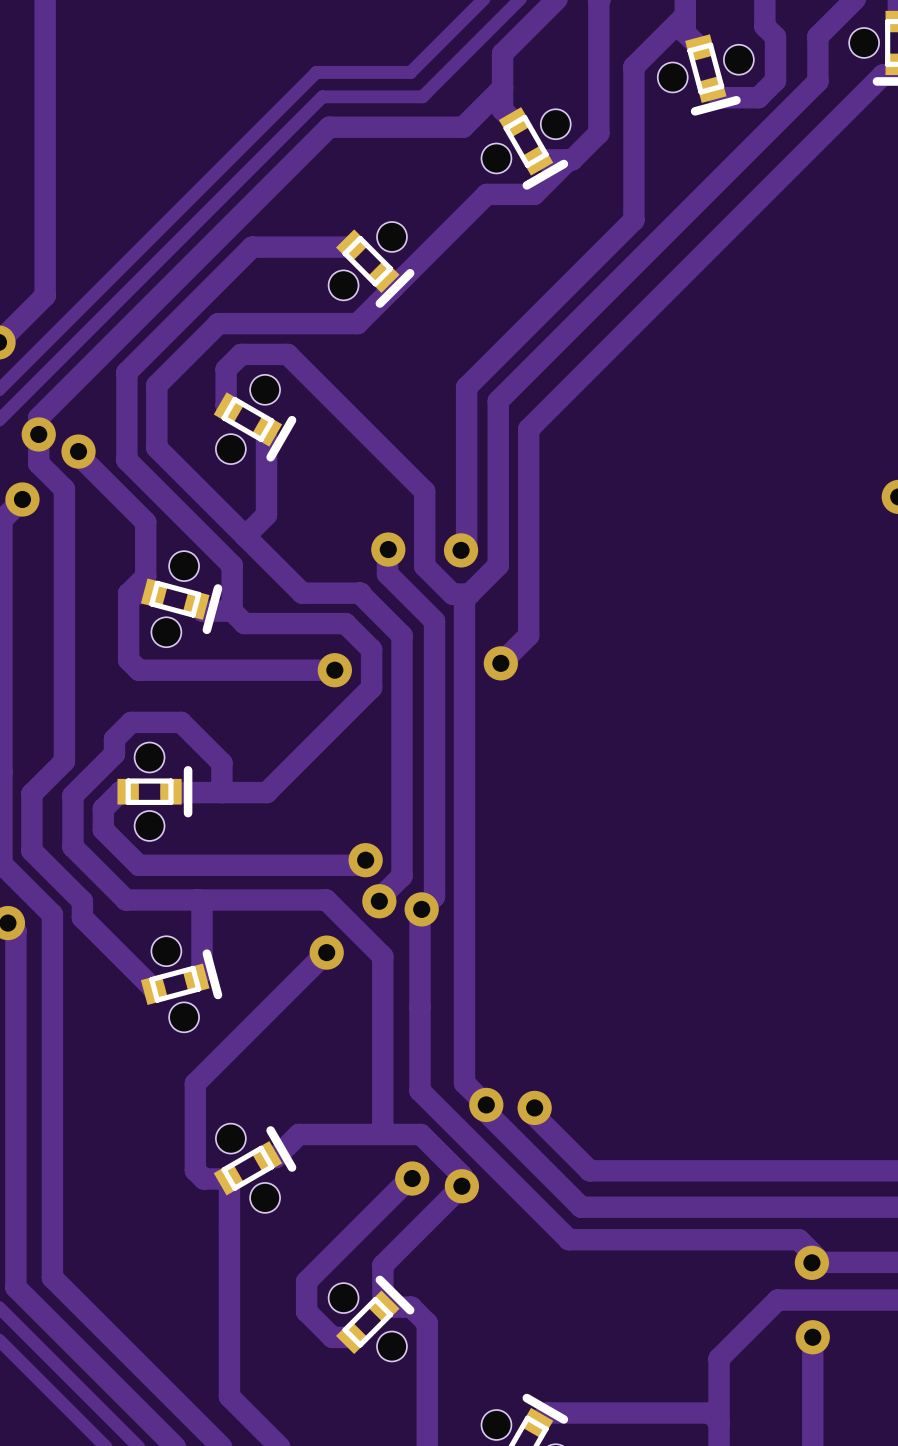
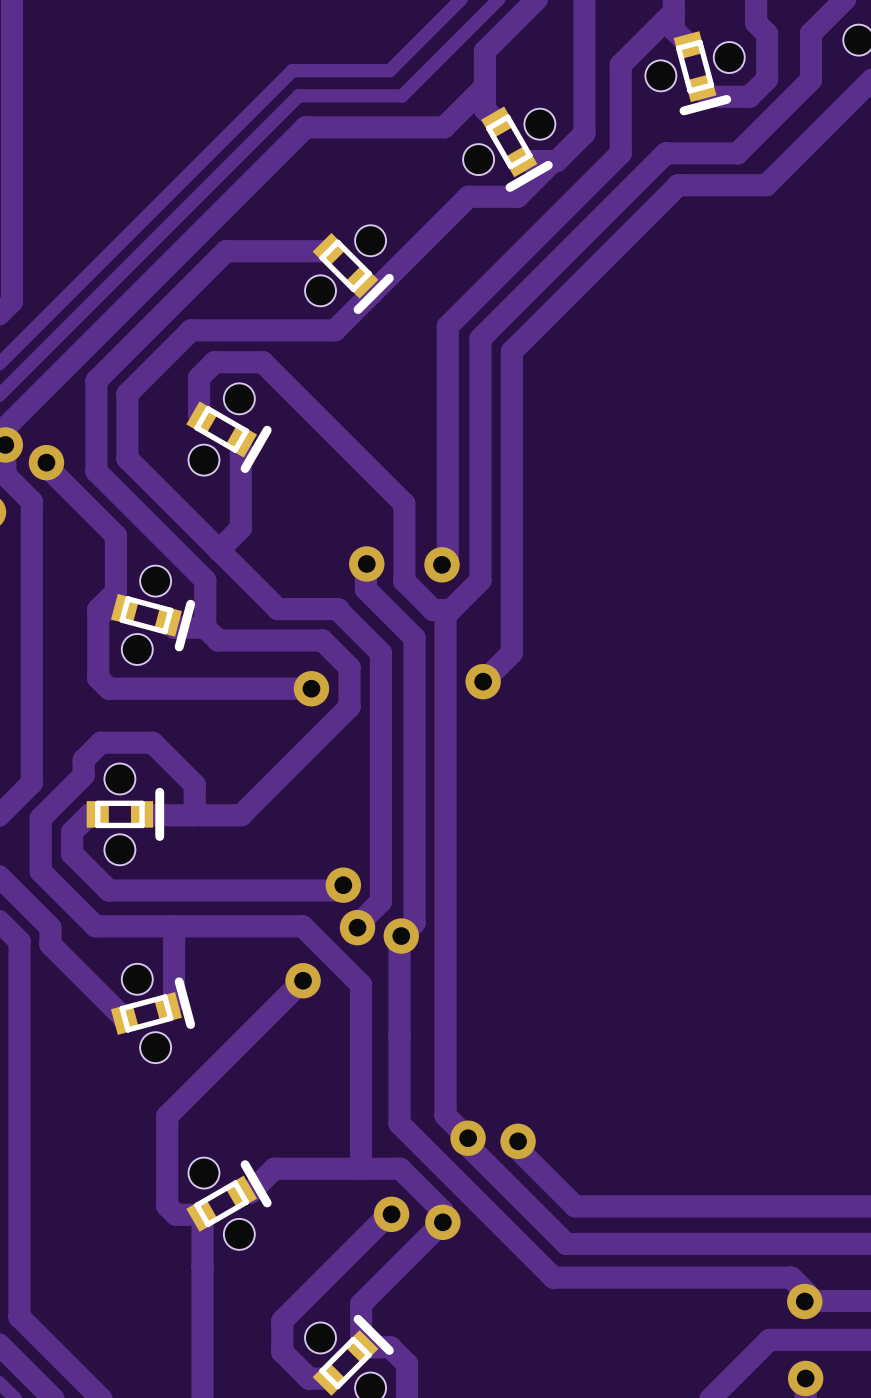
track: (633, 152) (633, 220) (466, 387) -> (620, 153) (447, 326) (447, 396)
track: (746, 152) (498, 401) -> (737, 153) (665, 153) (480, 338) (480, 410)
track: (774, 183) (528, 429) -> (766, 185) (678, 185) (511, 351) (511, 439)

